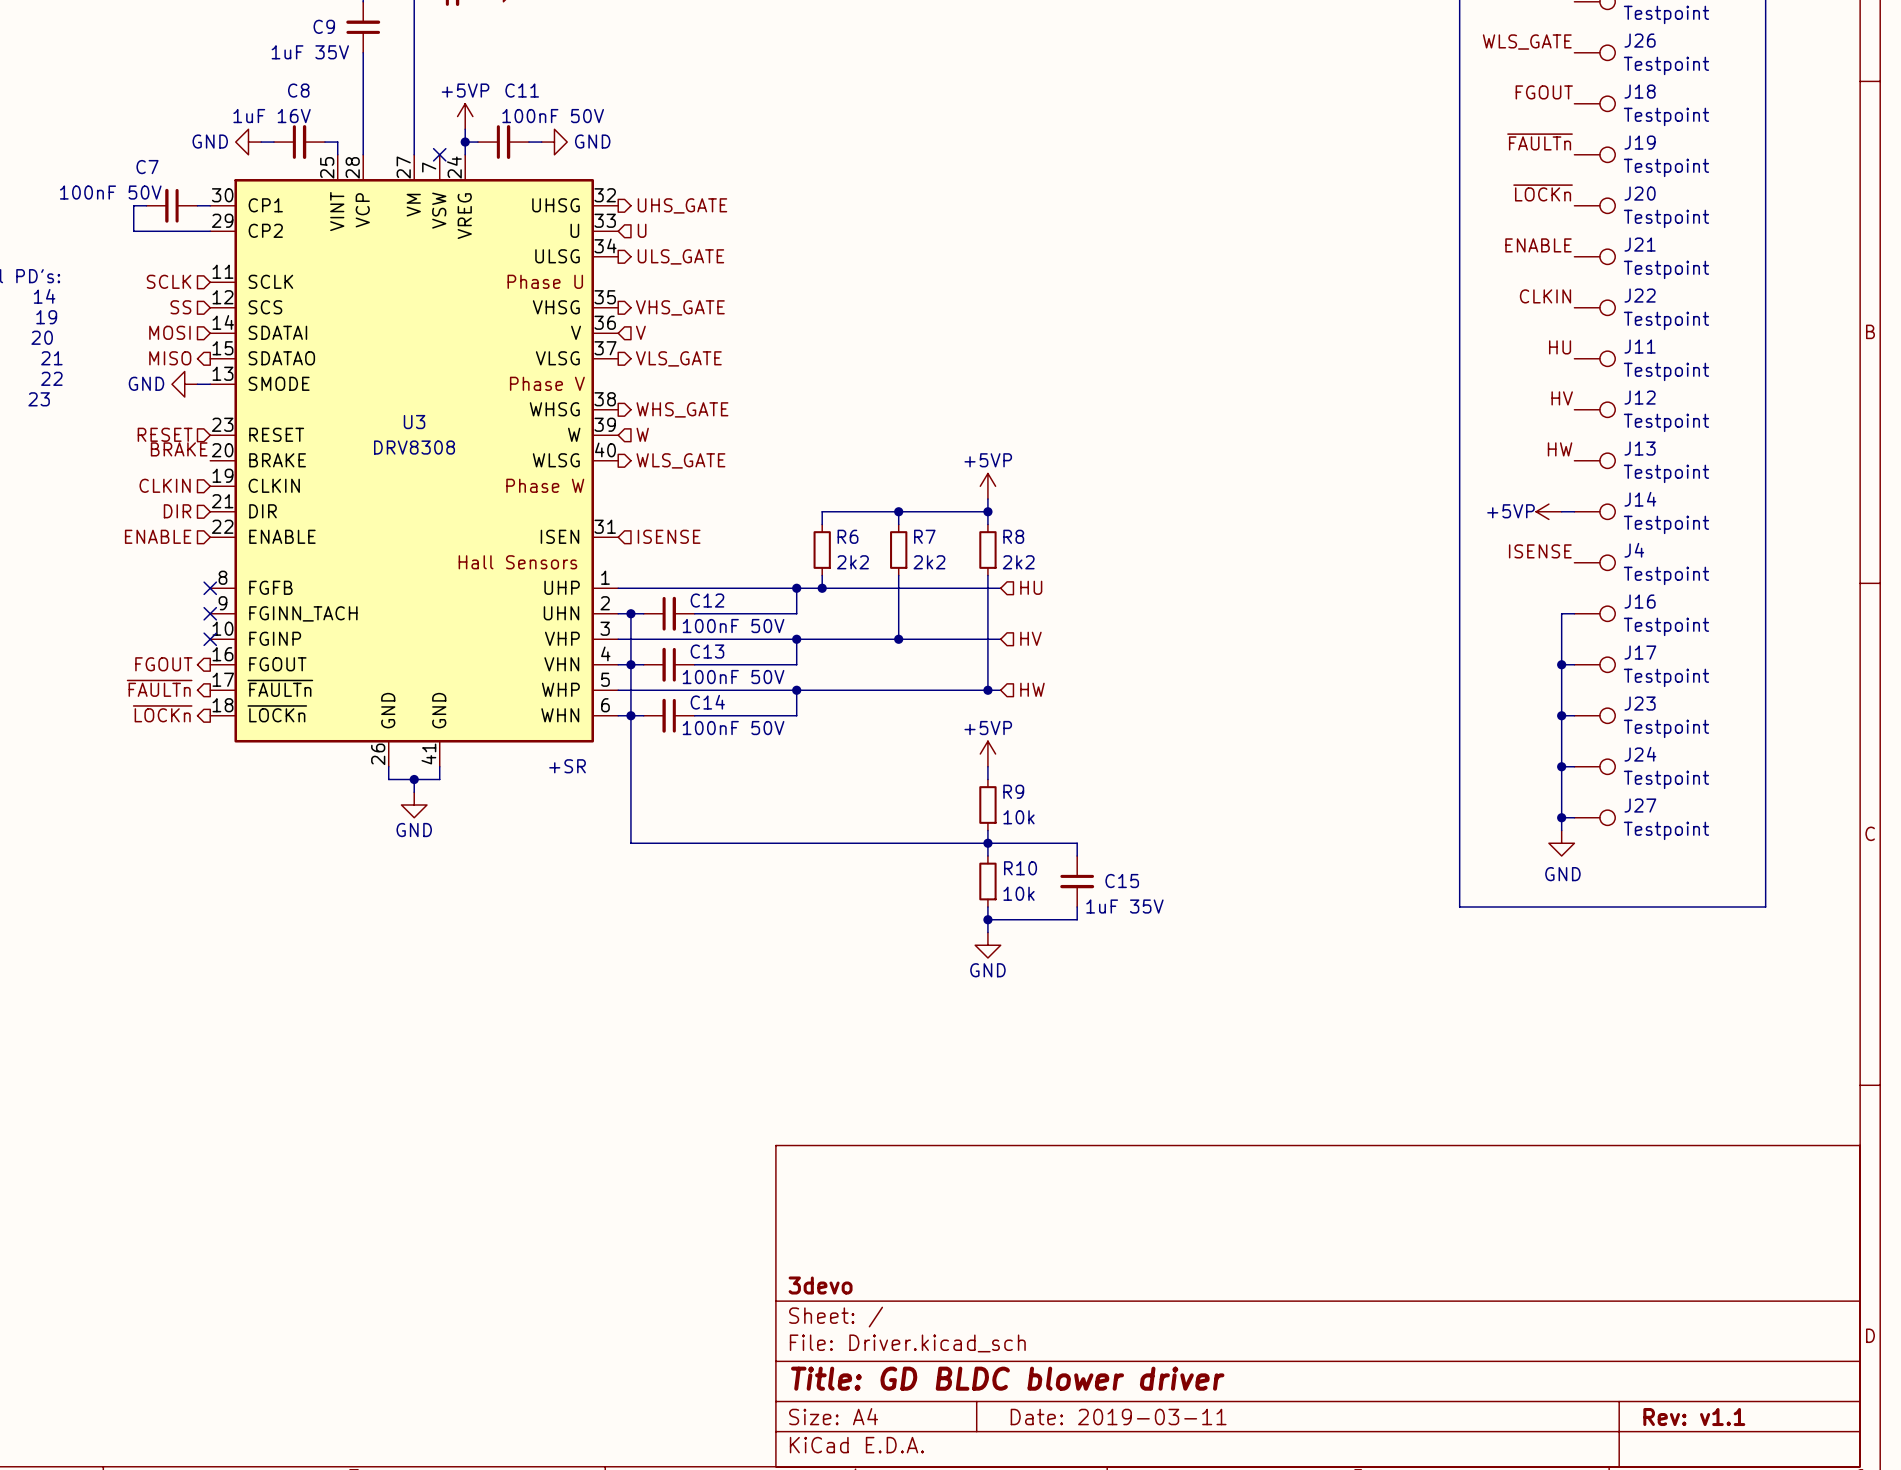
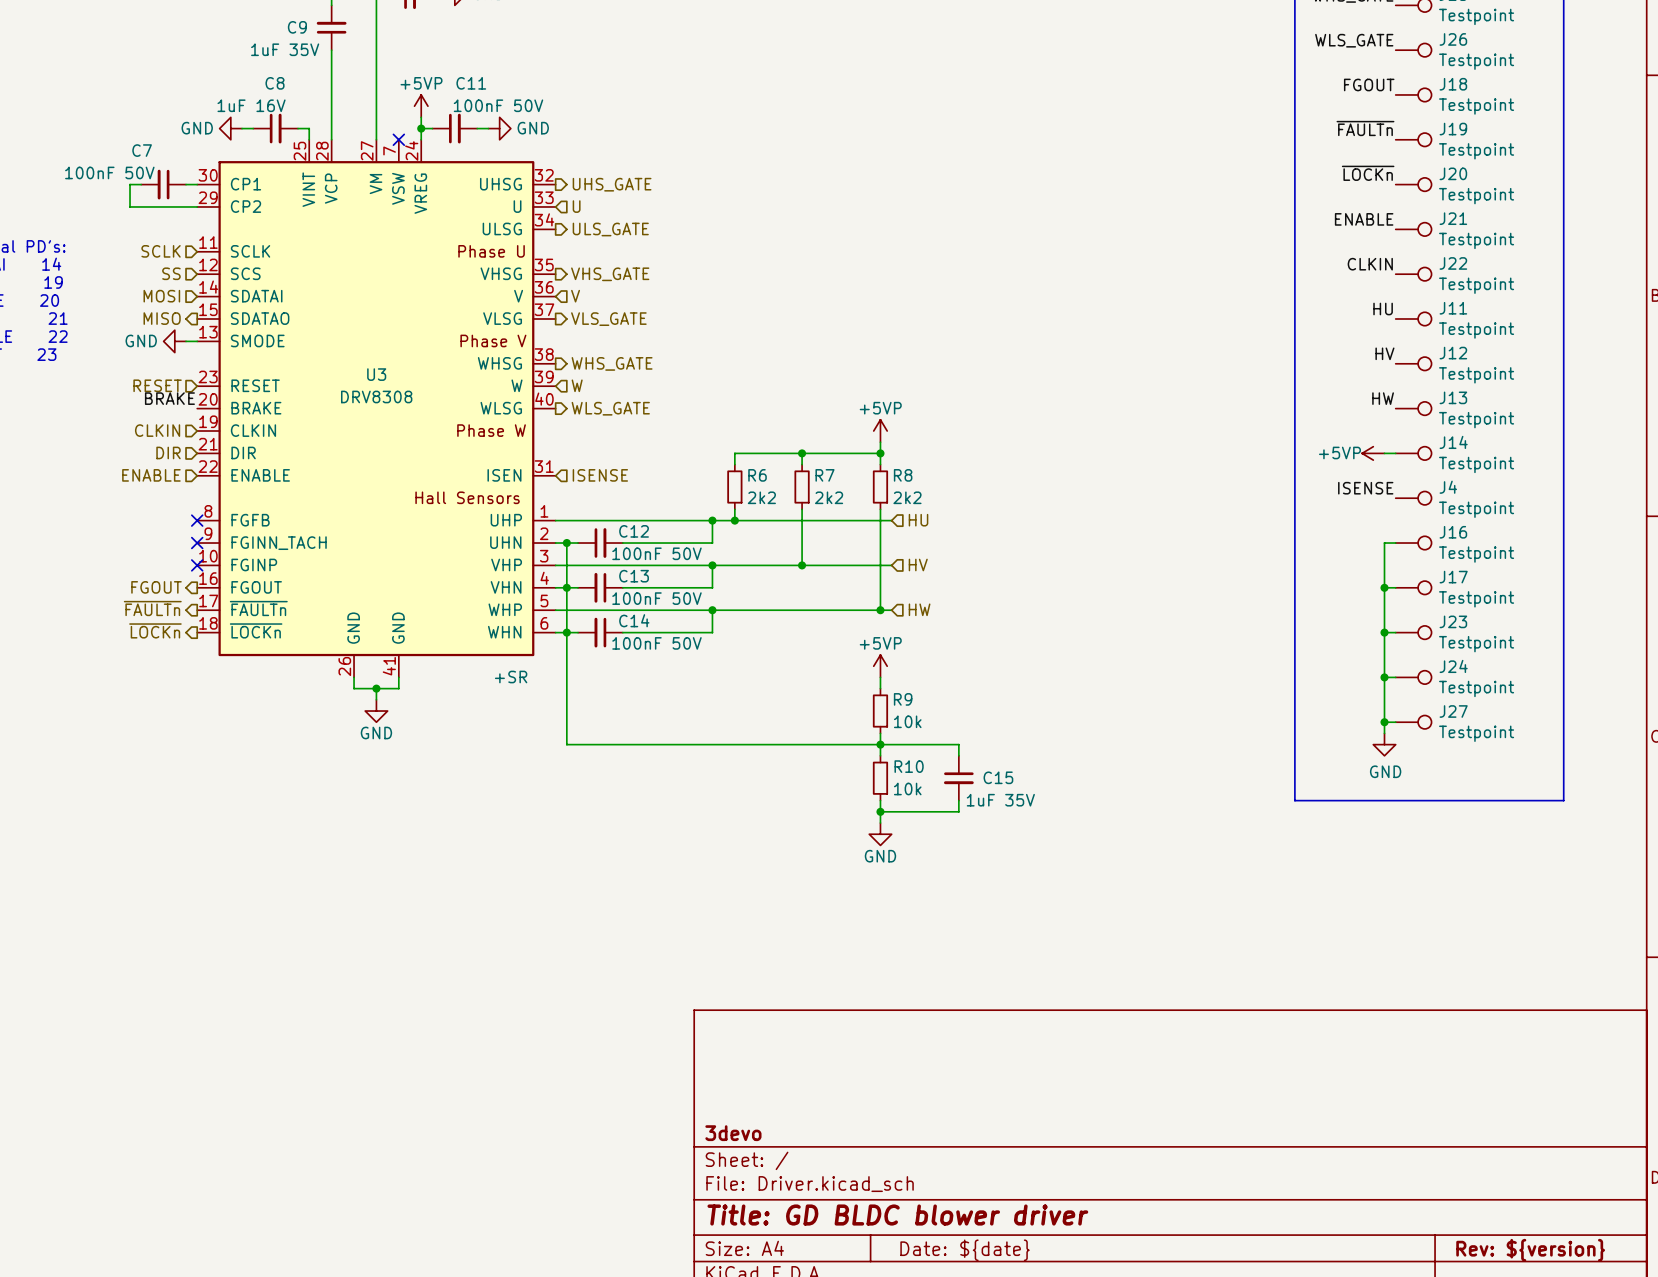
title block: Date: 2019-03-11 (1118, 1417) -> Date: ${date} (965, 1250)
title block: Rev: v1.1 (1694, 1417) -> Rev: ${version} (1530, 1250)

